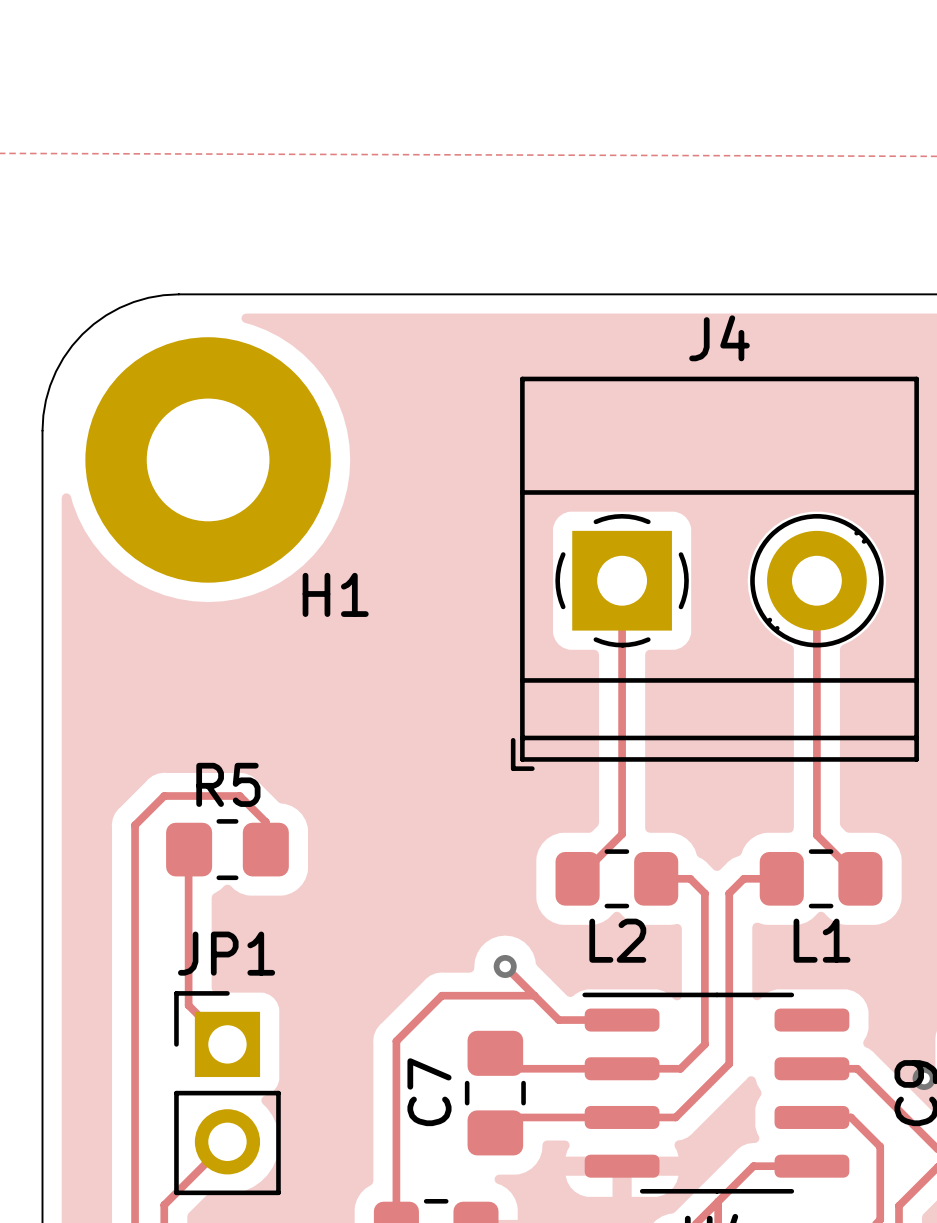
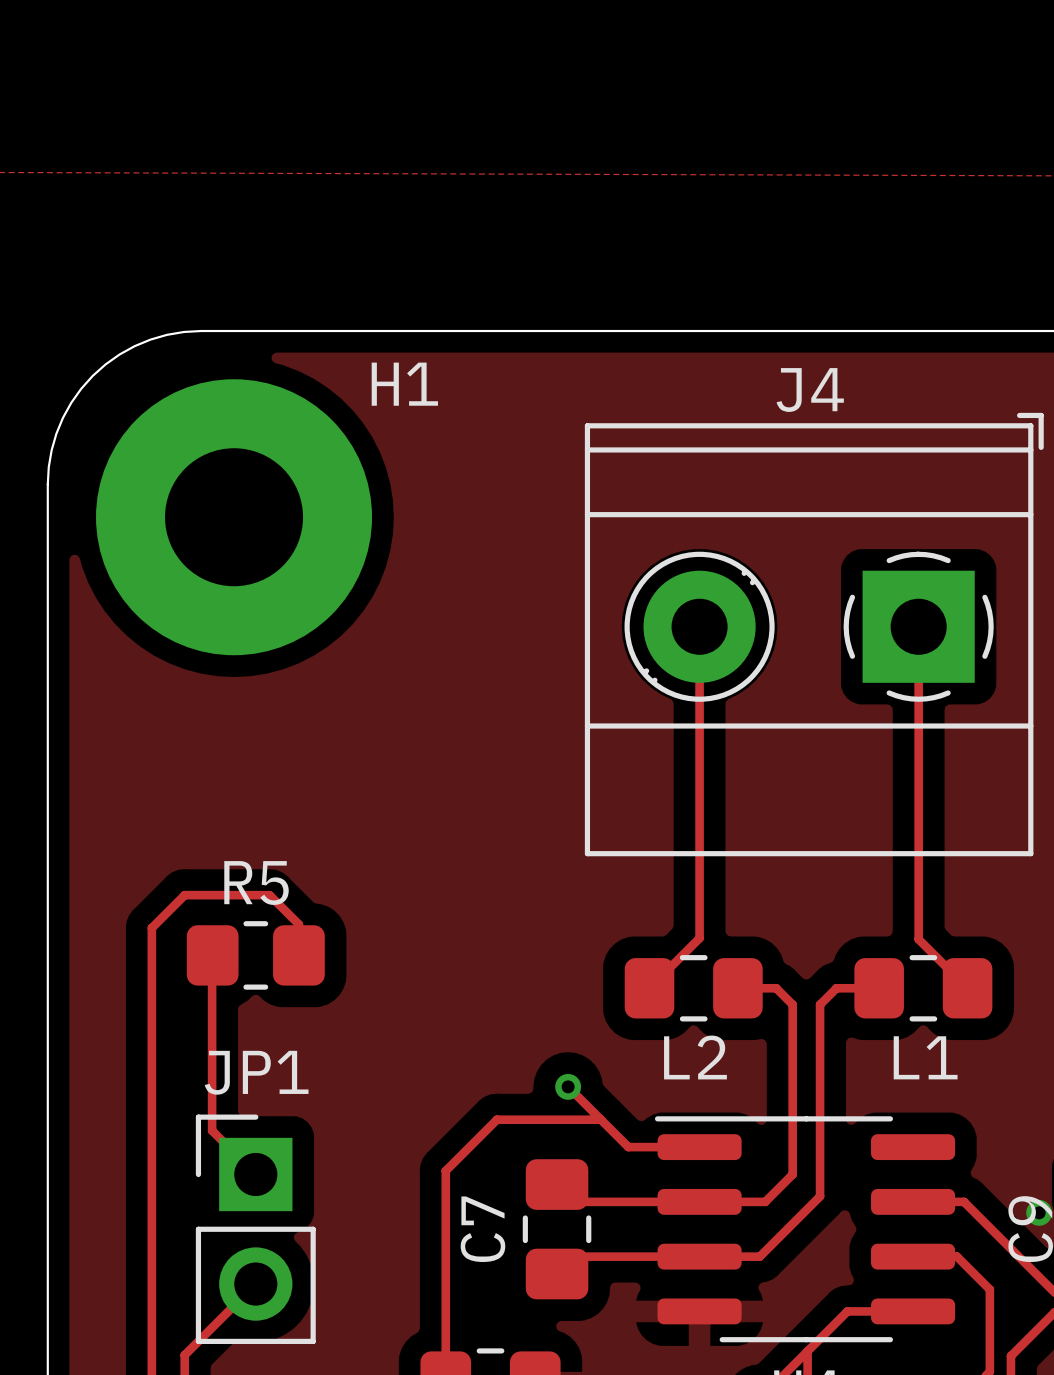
J4 rotation: 0° (714, 573) -> 180° (814, 634)
H1 name position: H1 (335, 594) -> H1 (404, 384)

